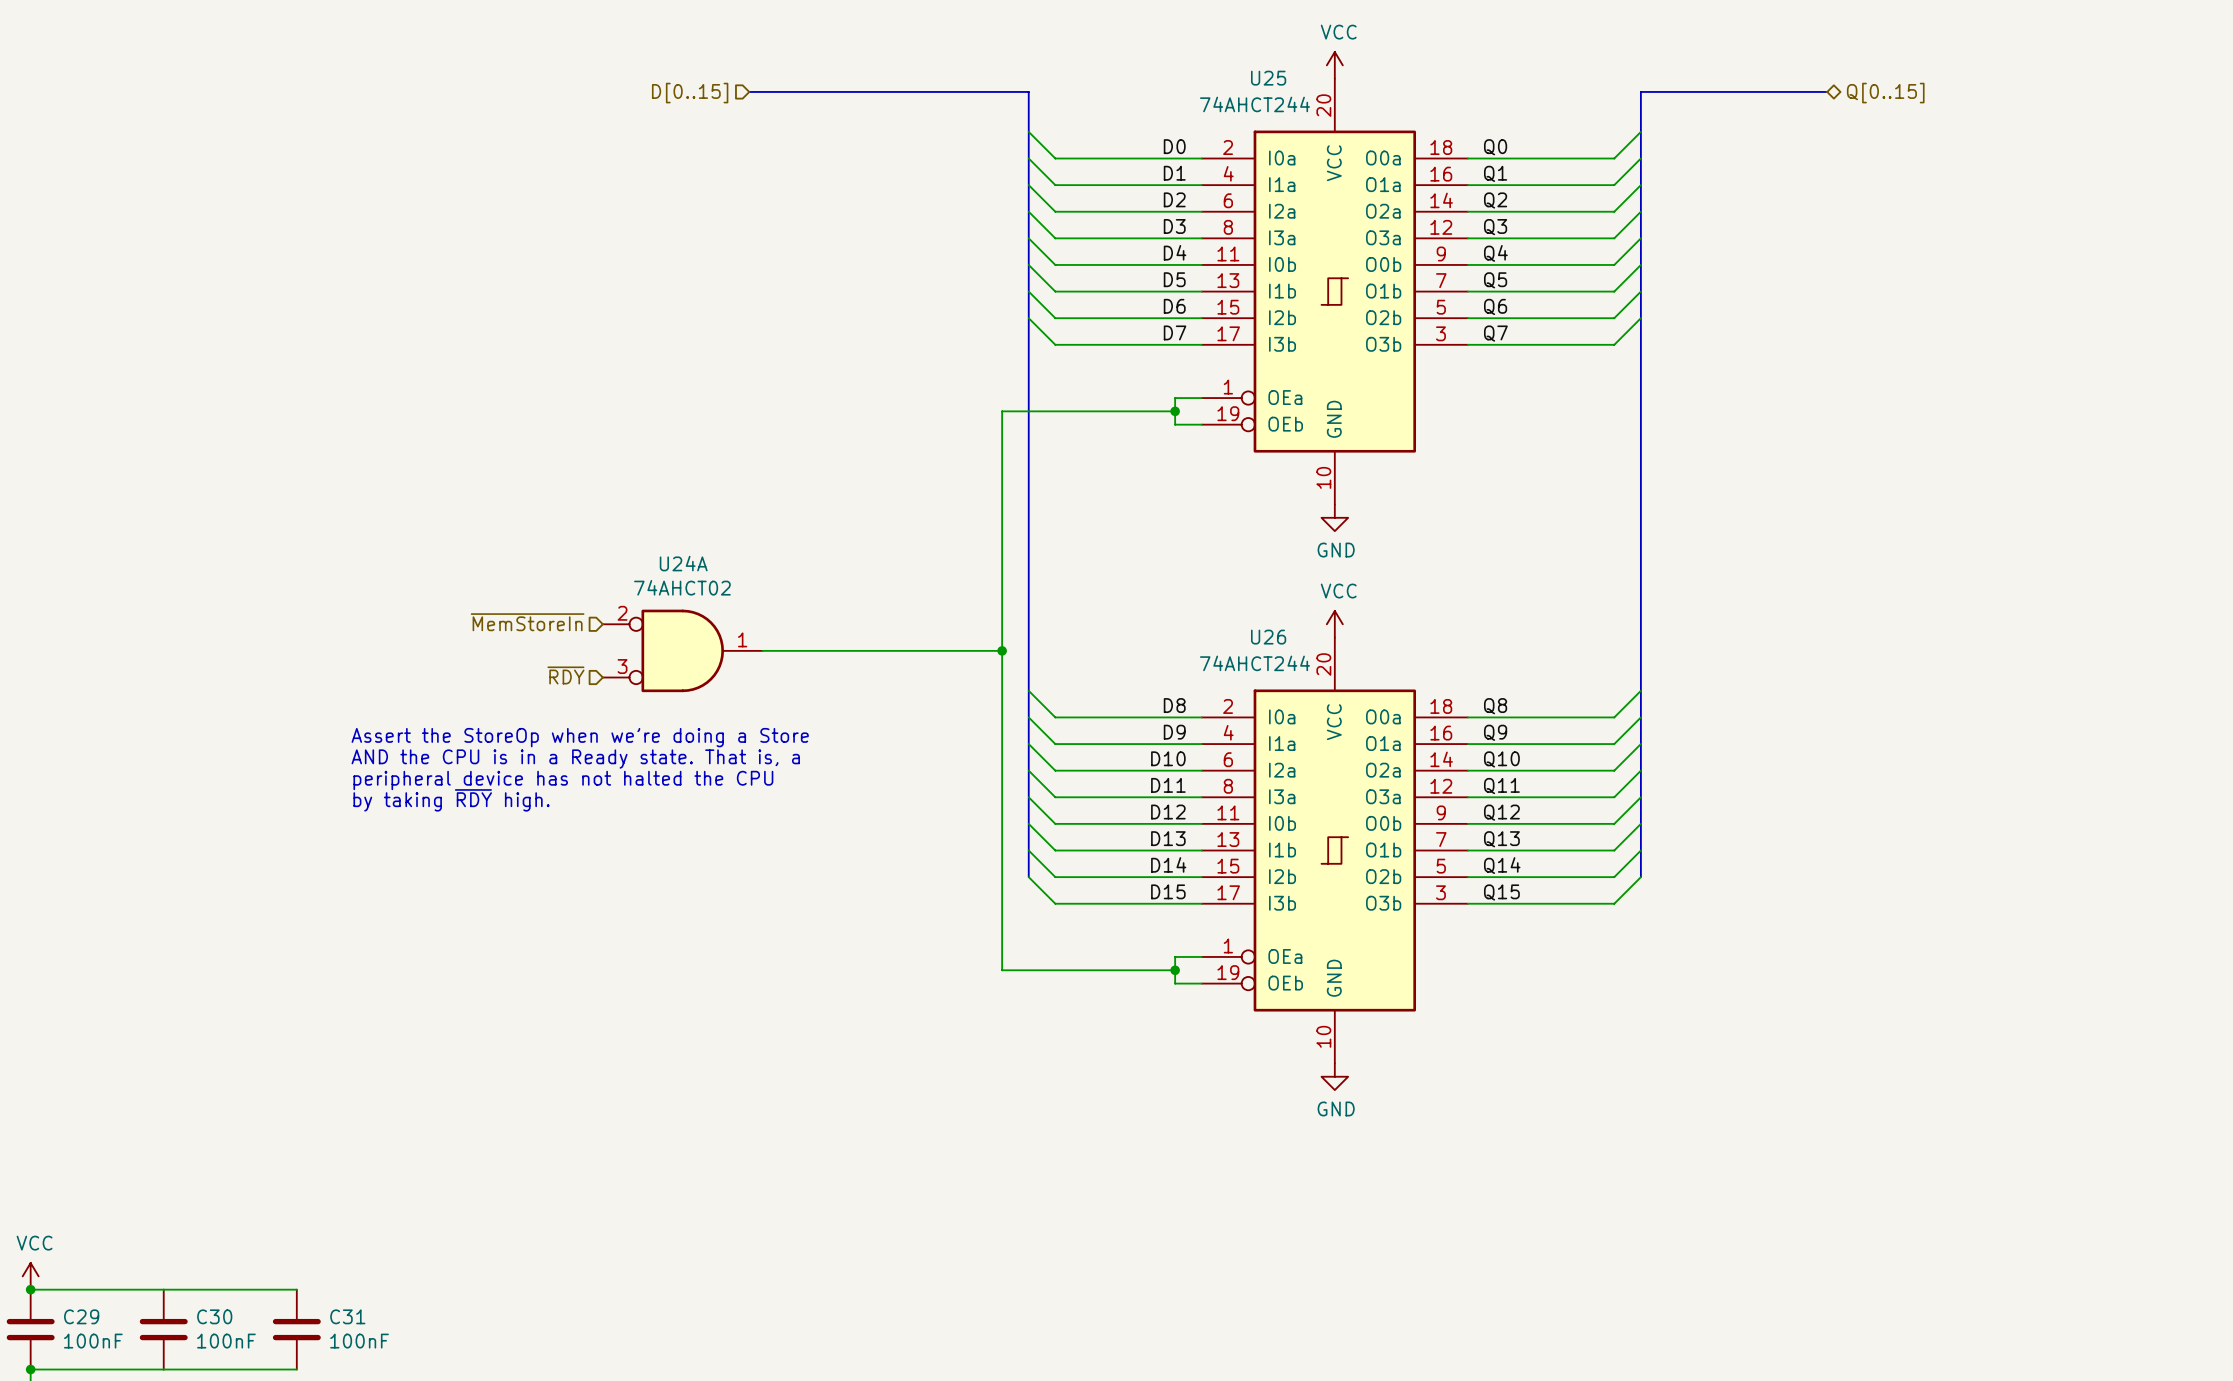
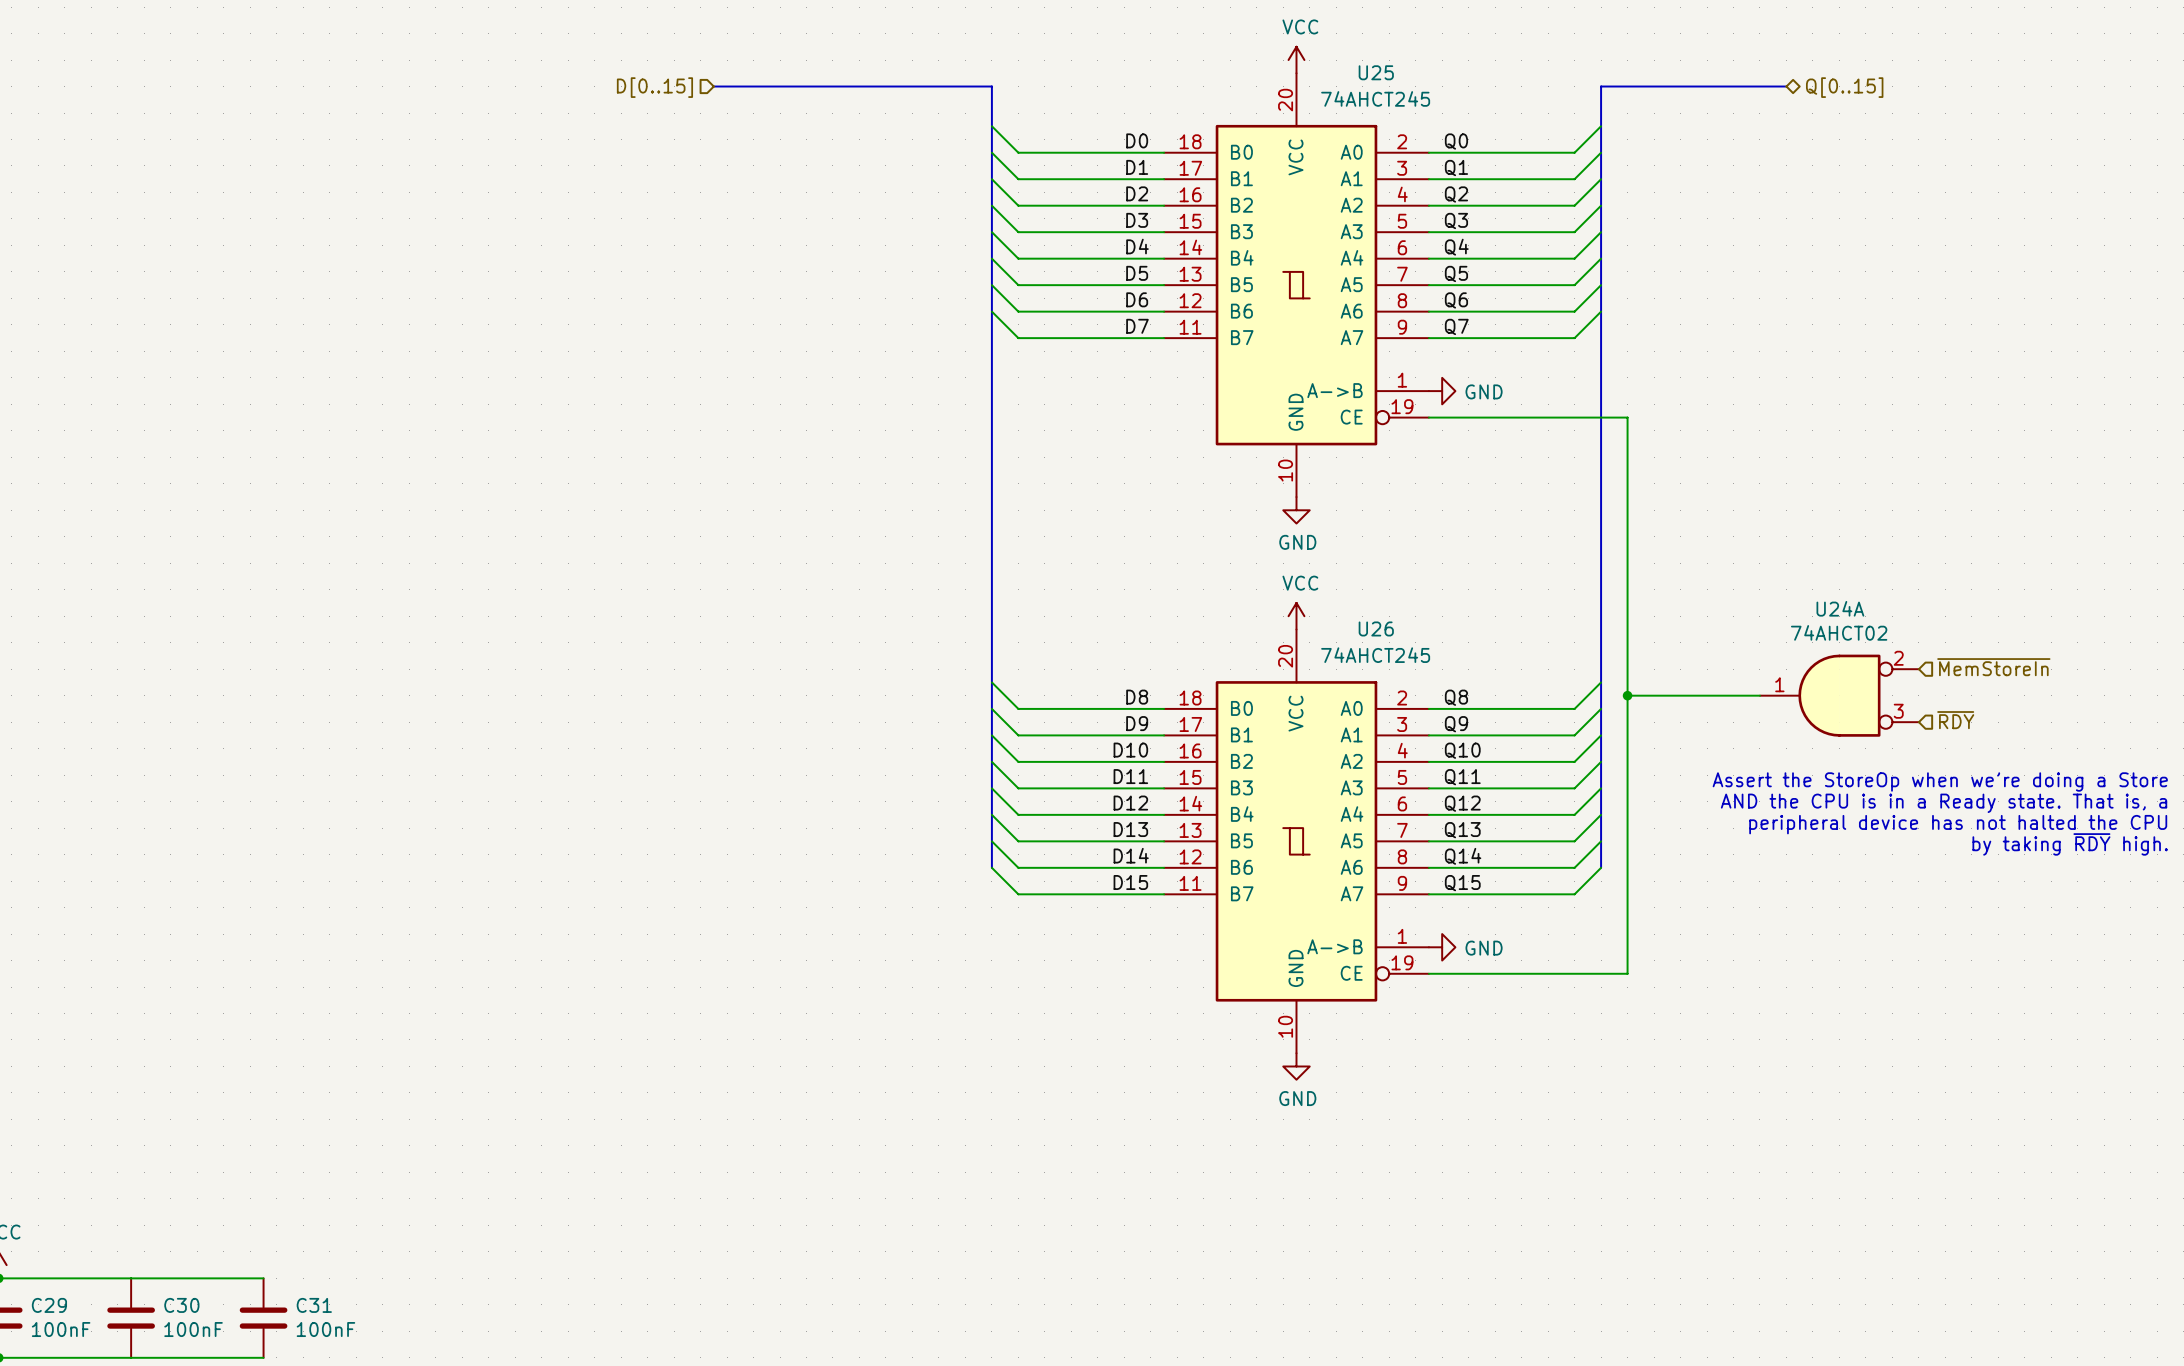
U25 symbol: [1201, 78, 1468, 505] -> [1164, 73, 1429, 498]
U25 name position: U25 (1268, 78) -> U25 (1376, 72)
U25 value: 74AHCT244 (1254, 104) -> 74AHCT245 (1375, 98)
wire: (1201, 398) (1175, 398) (1175, 424) (1201, 424) -> none
power symbol: none -> GND (1442, 391)
wire: (1175, 411) (1002, 411) (1002, 970) (1175, 970) -> none
junction: (1175, 411) -> none
wire: none -> (1428, 417) (1627, 417) (1627, 973) (1428, 973)
hierarchical label: ~{MemStoreIn} (527, 622) -> none
U26 symbol: [1201, 637, 1468, 1064] -> [1164, 629, 1429, 1054]
U26 name position: U26 (1268, 637) -> U26 (1376, 628)
U24A flip: as is (682, 650) -> left-right (1839, 695)
U24A position: (682, 650) -> (1839, 695)
wire: (762, 650) (1002, 650) -> none
junction: (1002, 650) -> none
U26 value: 74AHCT244 (1254, 663) -> 74AHCT245 (1375, 655)
hierarchical label: ~{RDY} (565, 675) -> none
hierarchical label: none -> ~{MemStoreIn} (1993, 667)
wire: none -> (1627, 695) (1759, 695)
junction: none -> (1627, 695)
hierarchical label: none -> ~{RDY} (1955, 720)
text: Assert the StoreOp when we’re doing a Store (580, 737) -> none
text: AND the CPU is in a Ready state. That is, a (575, 759) -> none
text: peripheral device has not halted the CPU (563, 780) -> none
text: none -> Assert the StoreOp when we’re doing a Store (1940, 781)
text: by taking ~{RDY} high. (451, 800) -> none
text: none -> AND the CPU is in a Ready state. That is, a (1944, 803)
text: none -> peripheral device has not halted the CPU (1958, 824)
text: none -> by taking ~{RDY} high. (2070, 844)
wire: (1201, 956) (1175, 956) (1175, 983) (1201, 983) -> none
power symbol: none -> GND (1442, 947)
junction: (1175, 970) -> none

